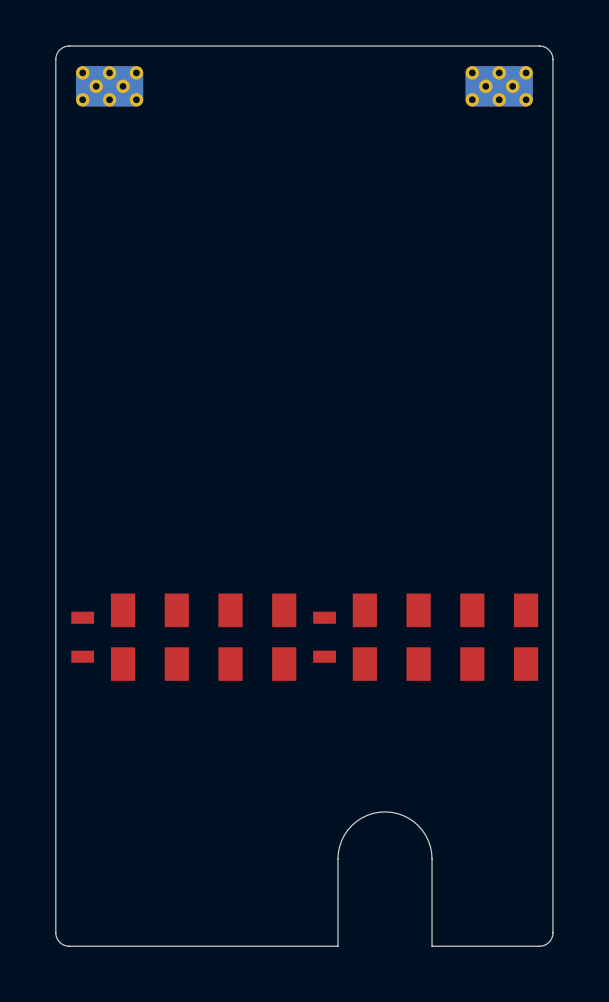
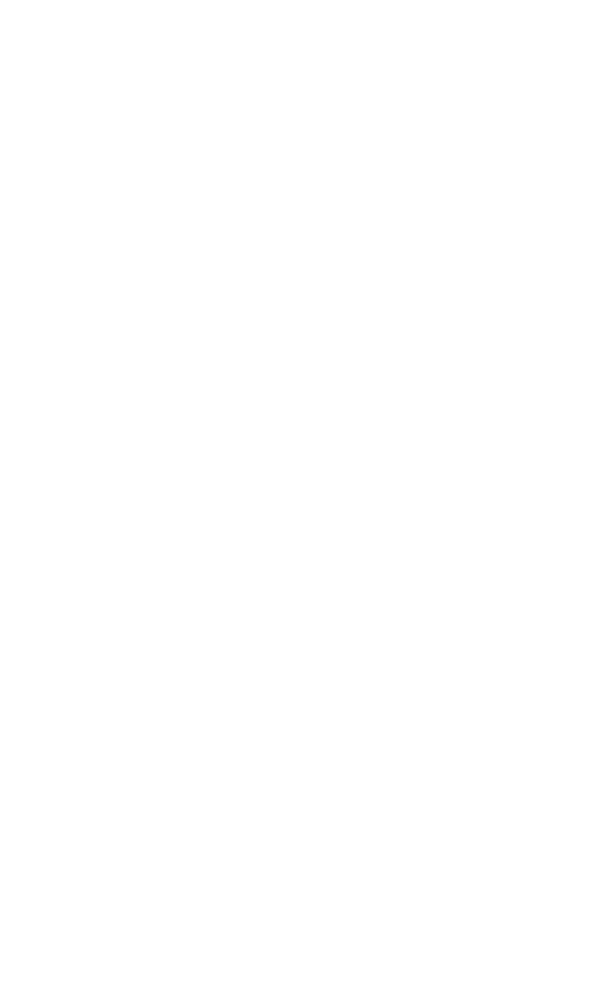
board edge: (539, 46) (69, 46) (62, 48) (57, 53) (55, 932) (57, 939) (63, 944) (337, 946) (337, 858) (341, 840) (351, 825) (361, 818) (372, 813) (385, 811) (397, 813) (408, 818) (418, 825) (428, 840) (432, 858) (432, 946) (541, 946) (547, 943) (551, 938) (552, 59) (549, 49) (539, 46) -> none
part: (109, 86) -> none
part: (499, 86) -> none
part: (82, 637) -> none
part: (123, 637) -> none
part: (176, 637) -> none
part: (230, 637) -> none
part: (284, 637) -> none
part: (324, 637) -> none
part: (364, 637) -> none
part: (418, 637) -> none
part: (472, 637) -> none
part: (526, 637) -> none

